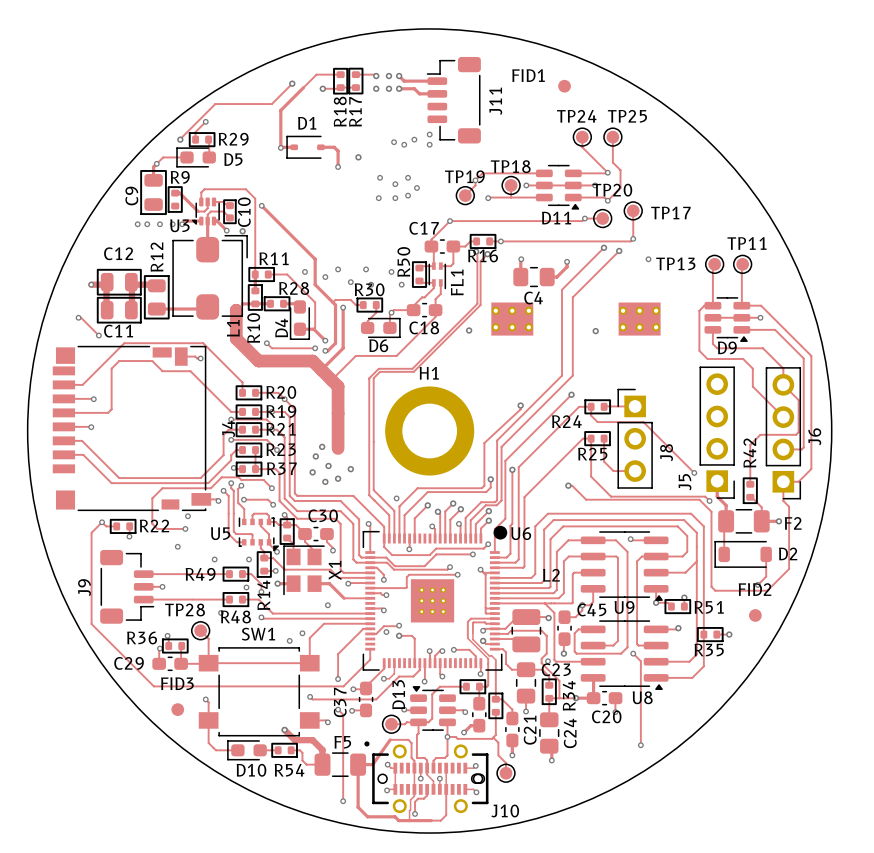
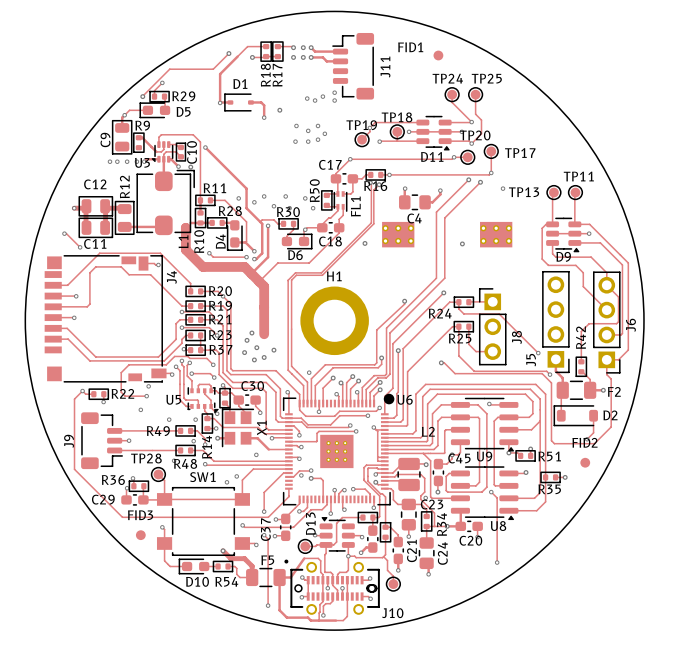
J4 name position: J4 (228, 428) -> J4 (171, 277)

